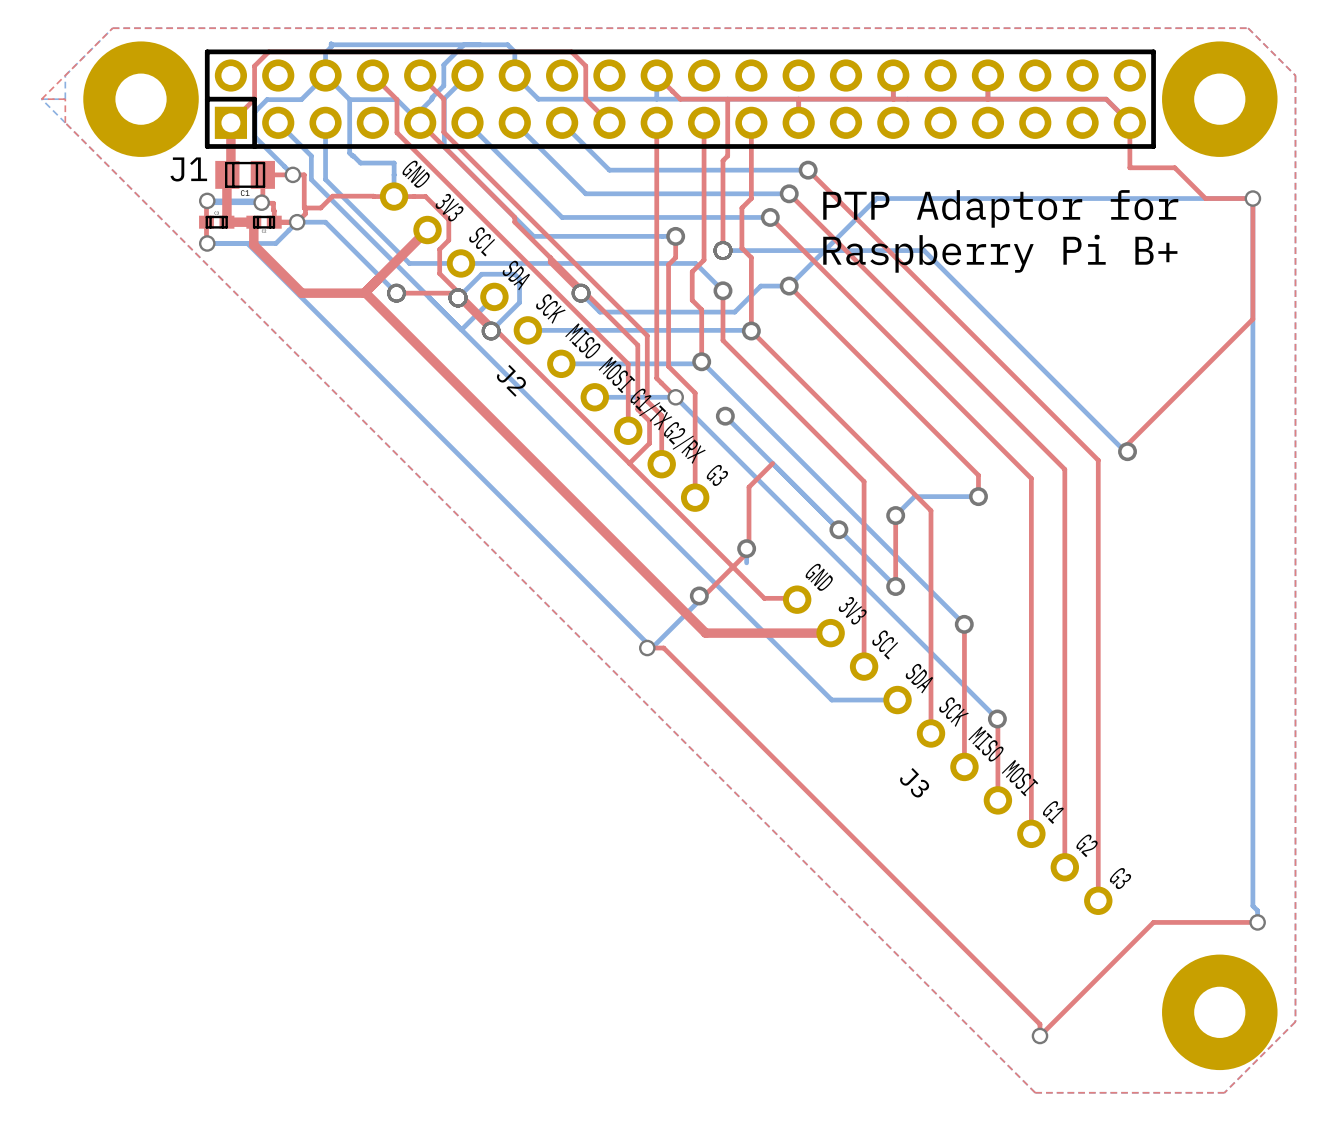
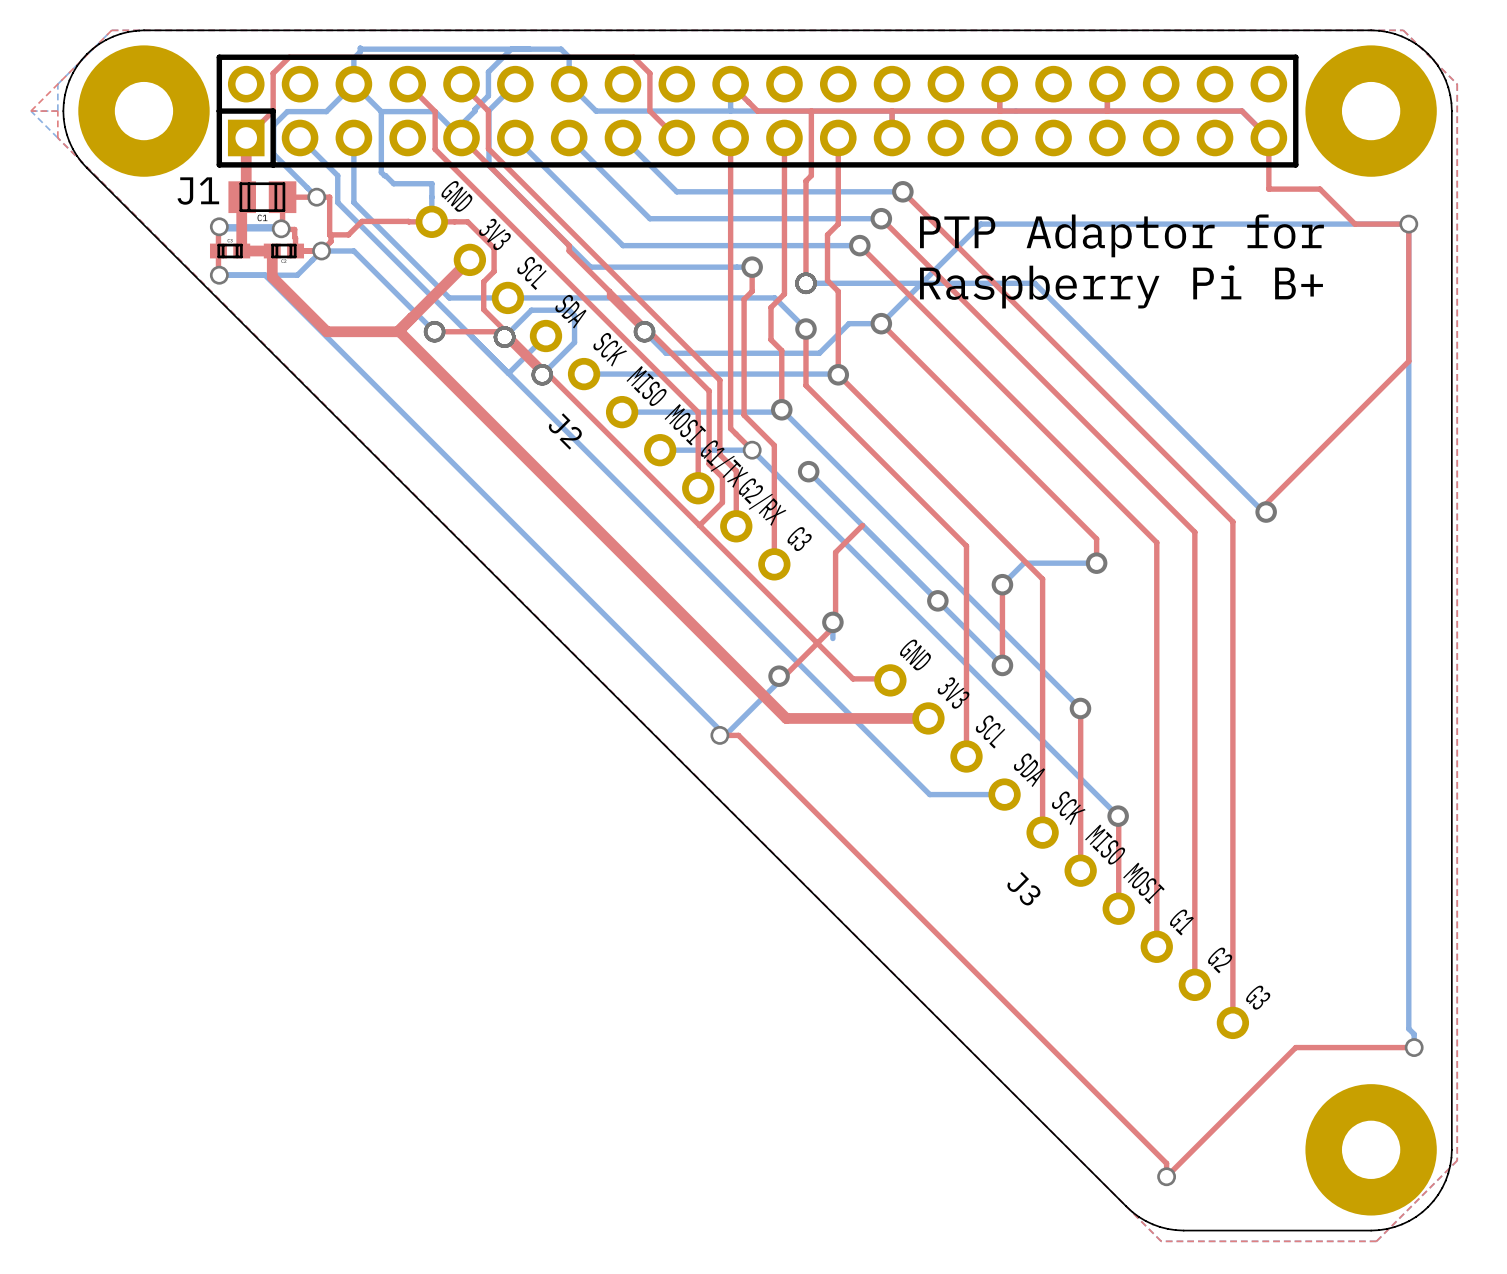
board edge: none -> (143, 30) (120, 33) (99, 44) (81, 59) (69, 80) (63, 102) (63, 118) (69, 141) (81, 162) (1132, 1212) (1152, 1224) (1175, 1230) (1371, 1230) (1386, 1229) (1401, 1224) (1416, 1216) (1428, 1206) (1438, 1194) (1445, 1180) (1450, 1165) (1451, 1149) (1451, 111) (1450, 95) (1445, 80) (1438, 66) (1428, 53) (1415, 43) (1401, 36) (1386, 31) (1371, 30) (143, 30)

